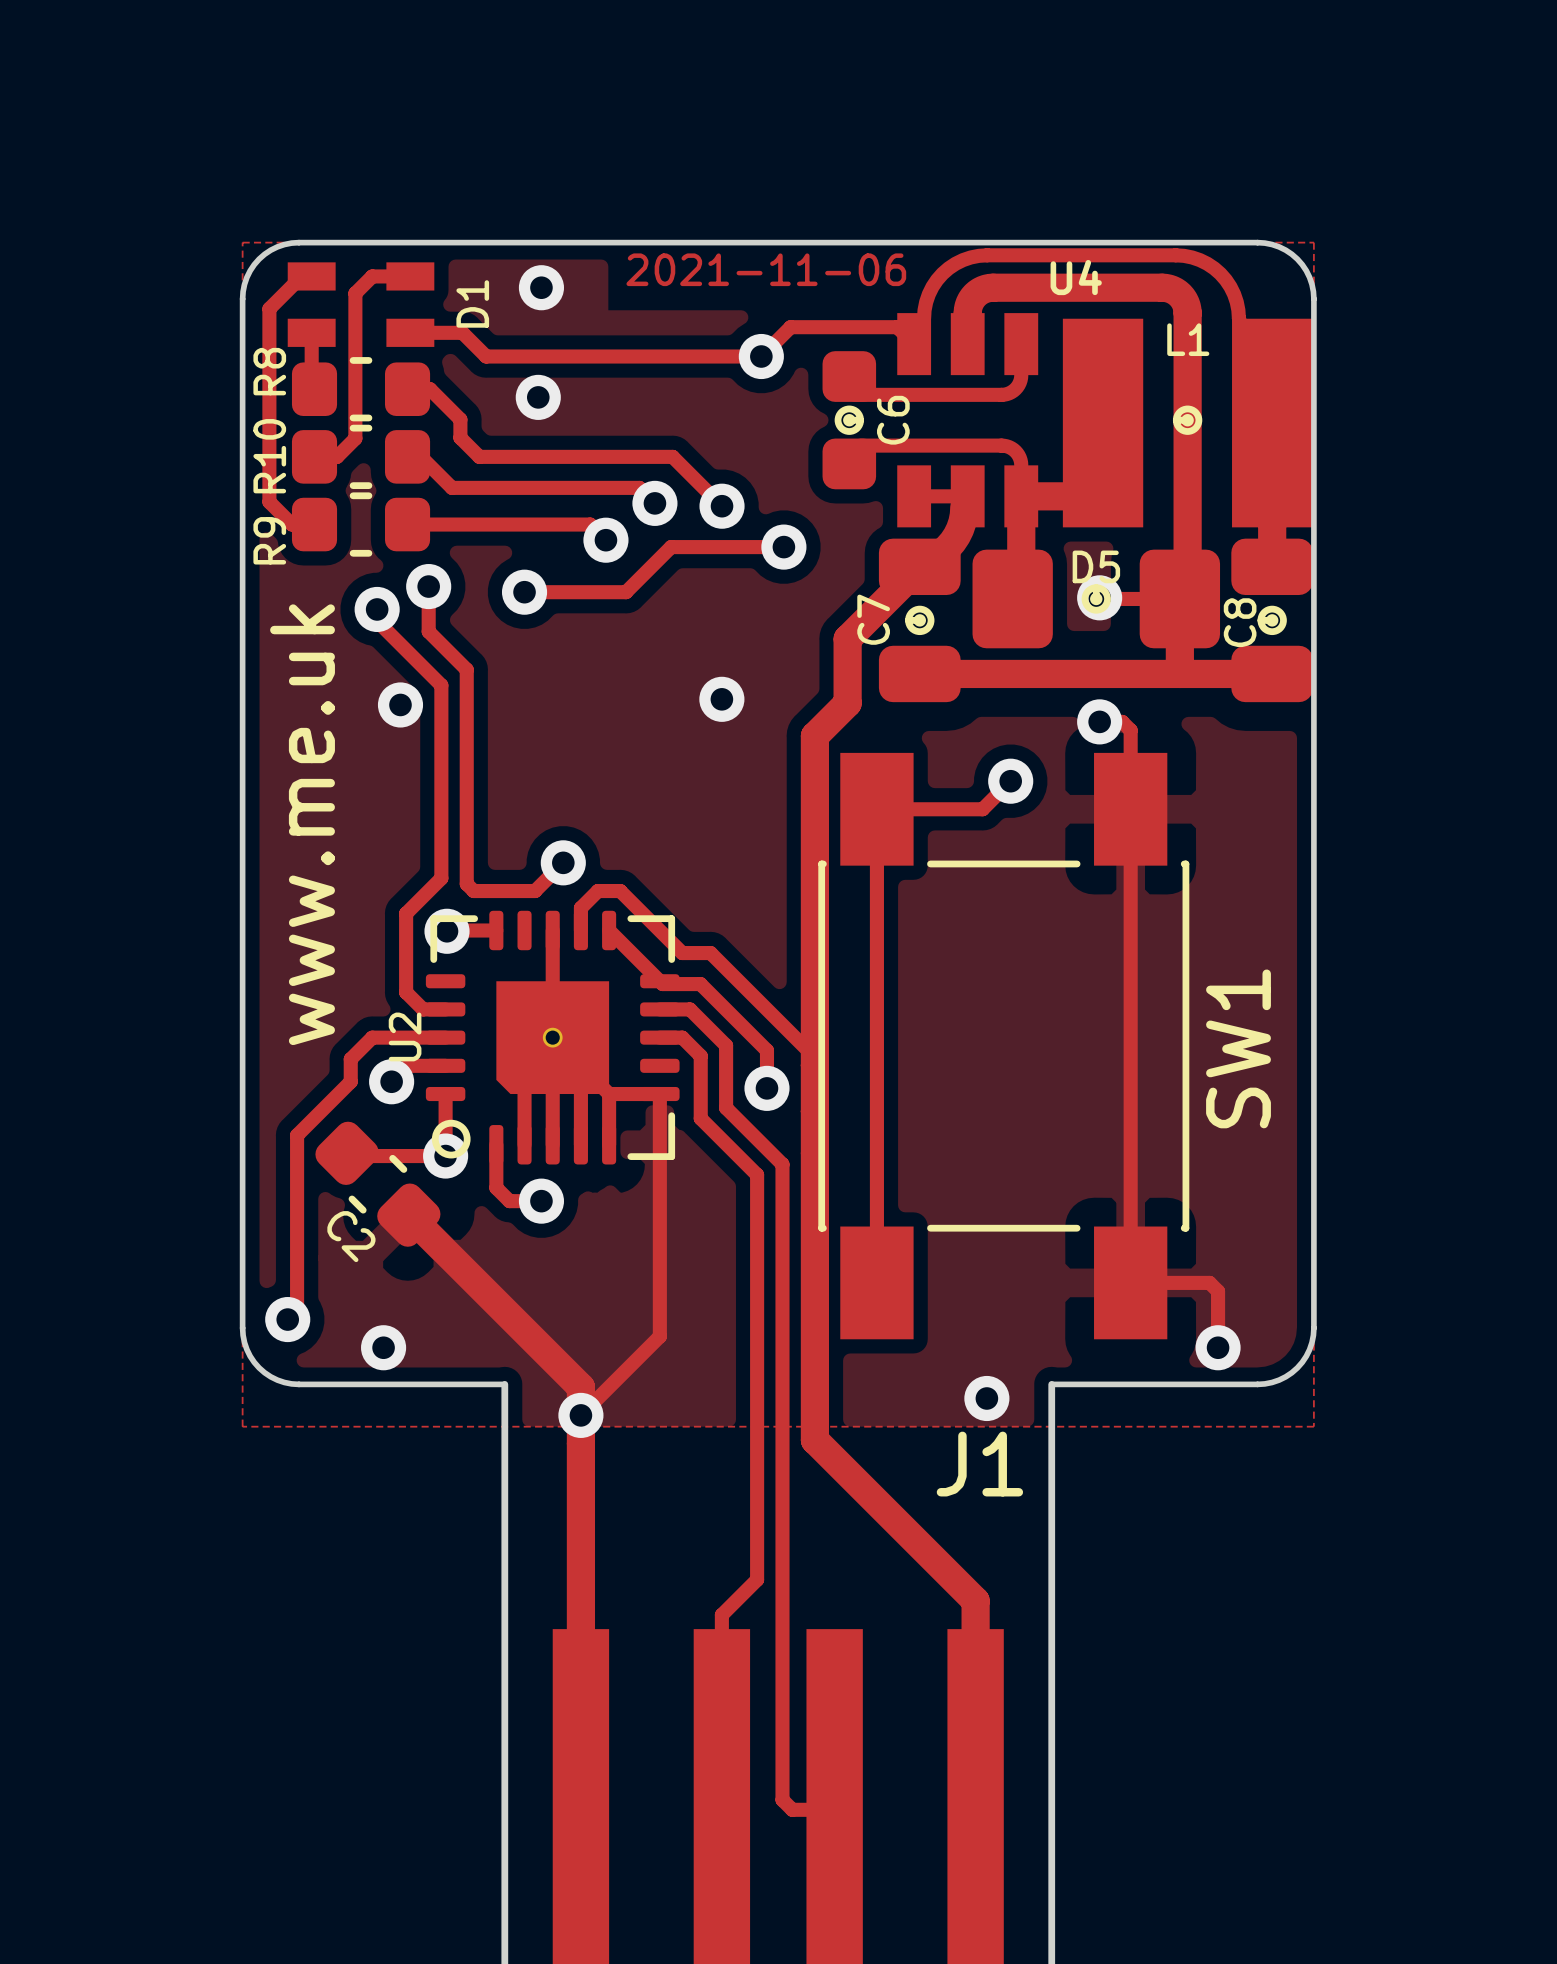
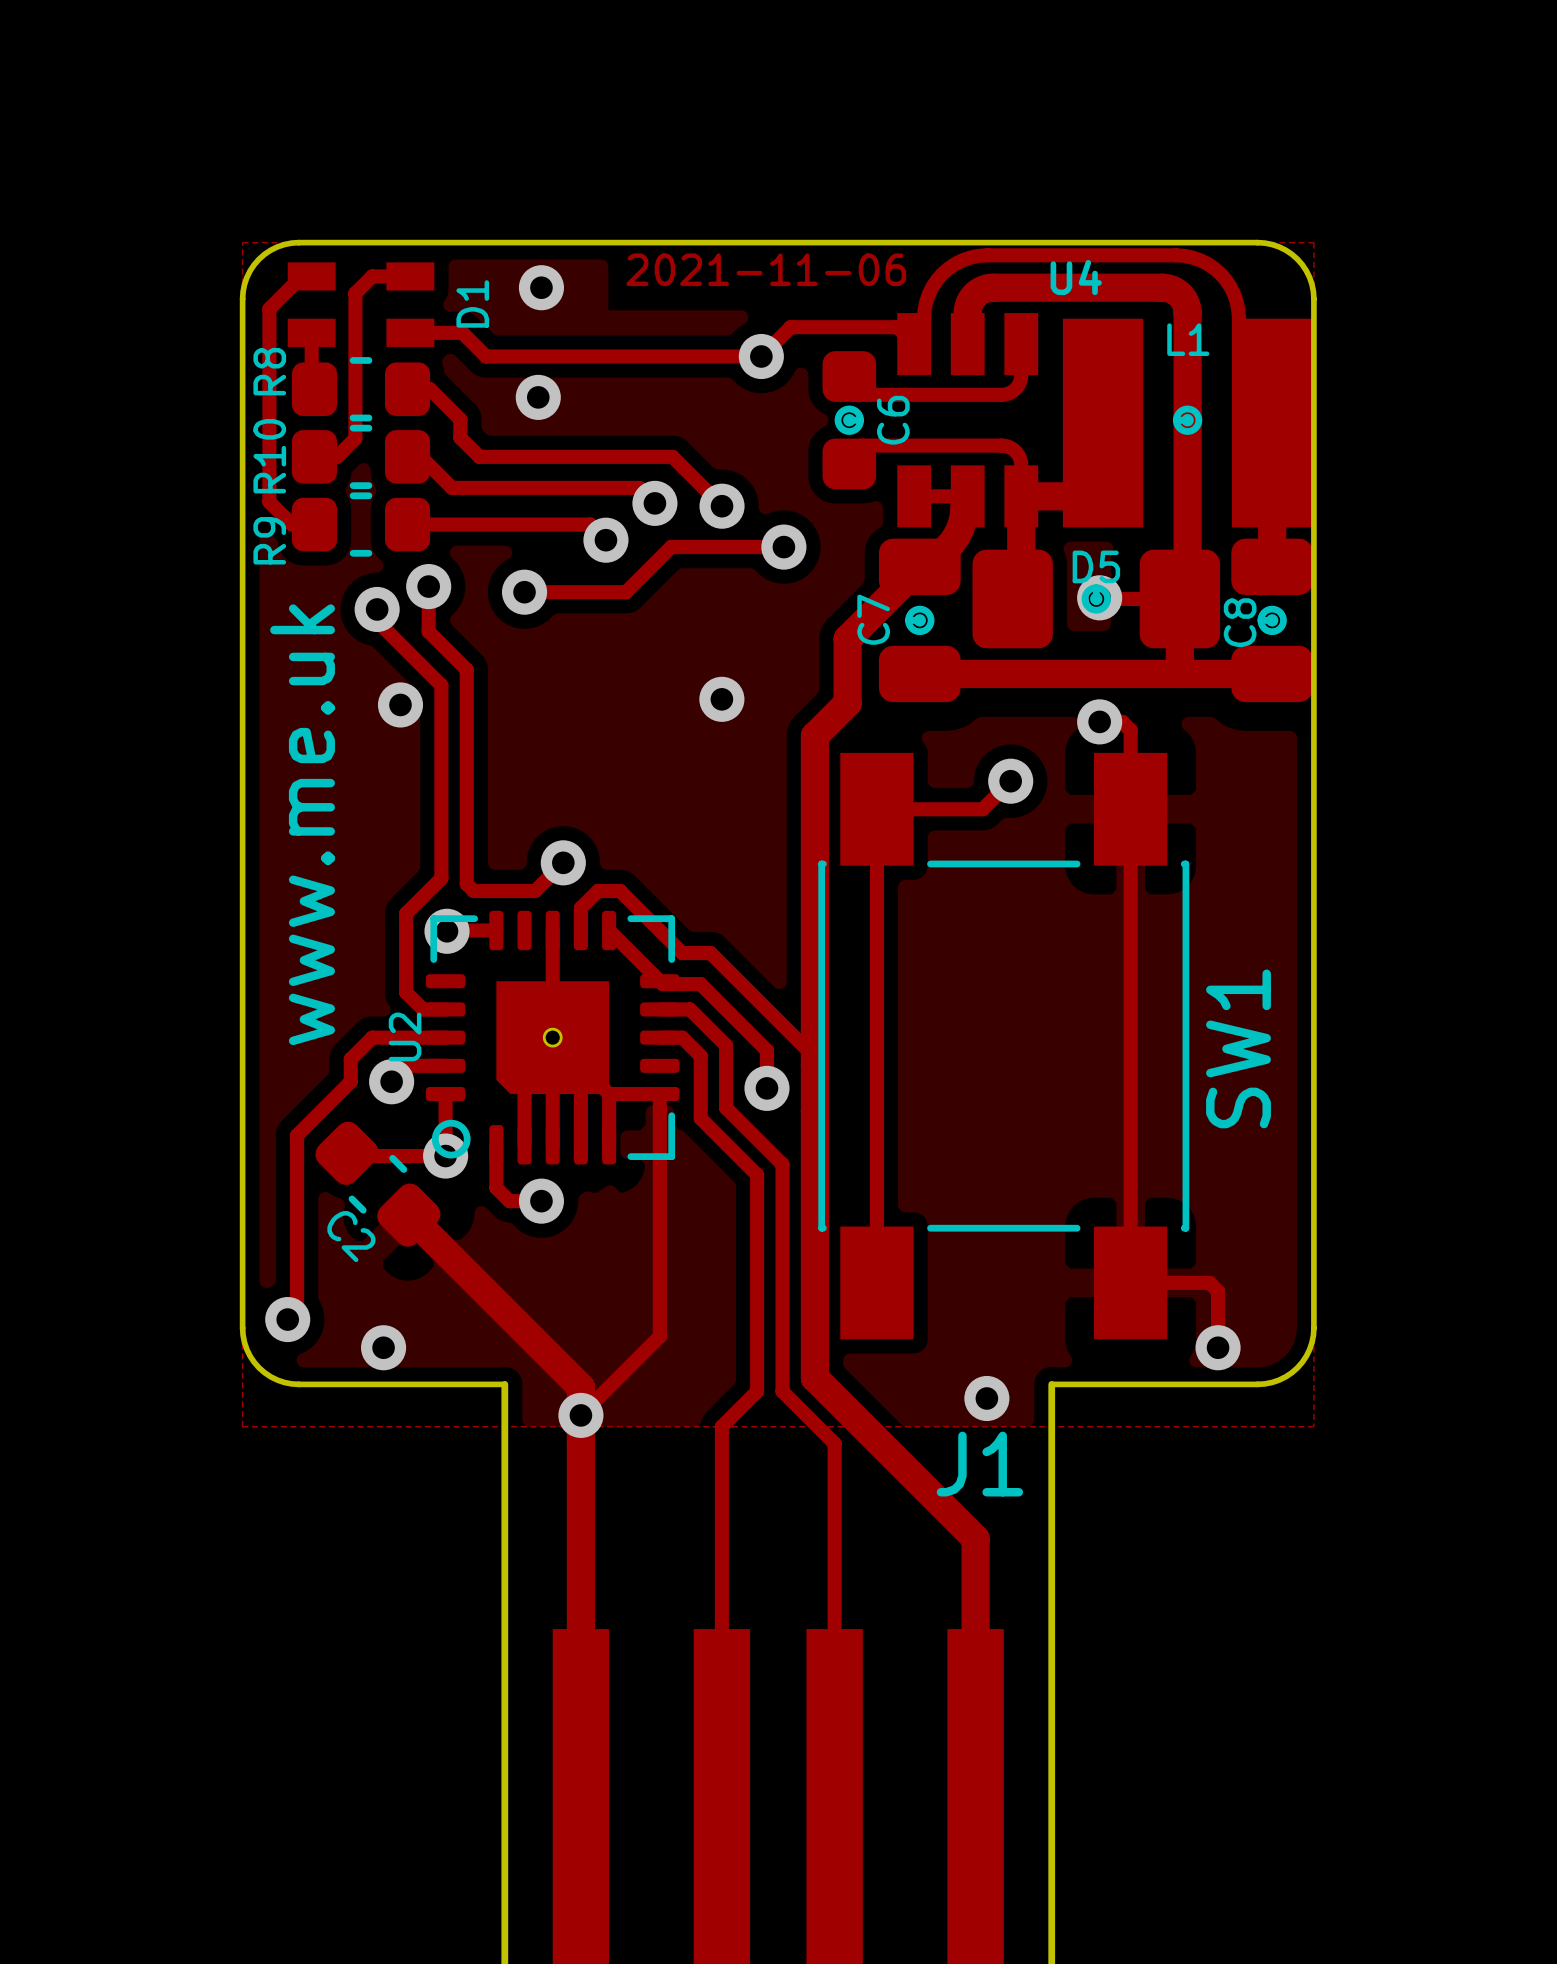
track: (814, 1378) (814, 1440) (975, 1600) -> (814, 1378) (975, 1538) (975, 1600)
track: (757, 1391) (757, 1579) (721, 1615) -> (757, 1391) (721, 1426) (721, 1615)
track: (782, 1391) (782, 1799) (792, 1809) (834, 1809) -> (782, 1391) (834, 1443) (834, 1809)

